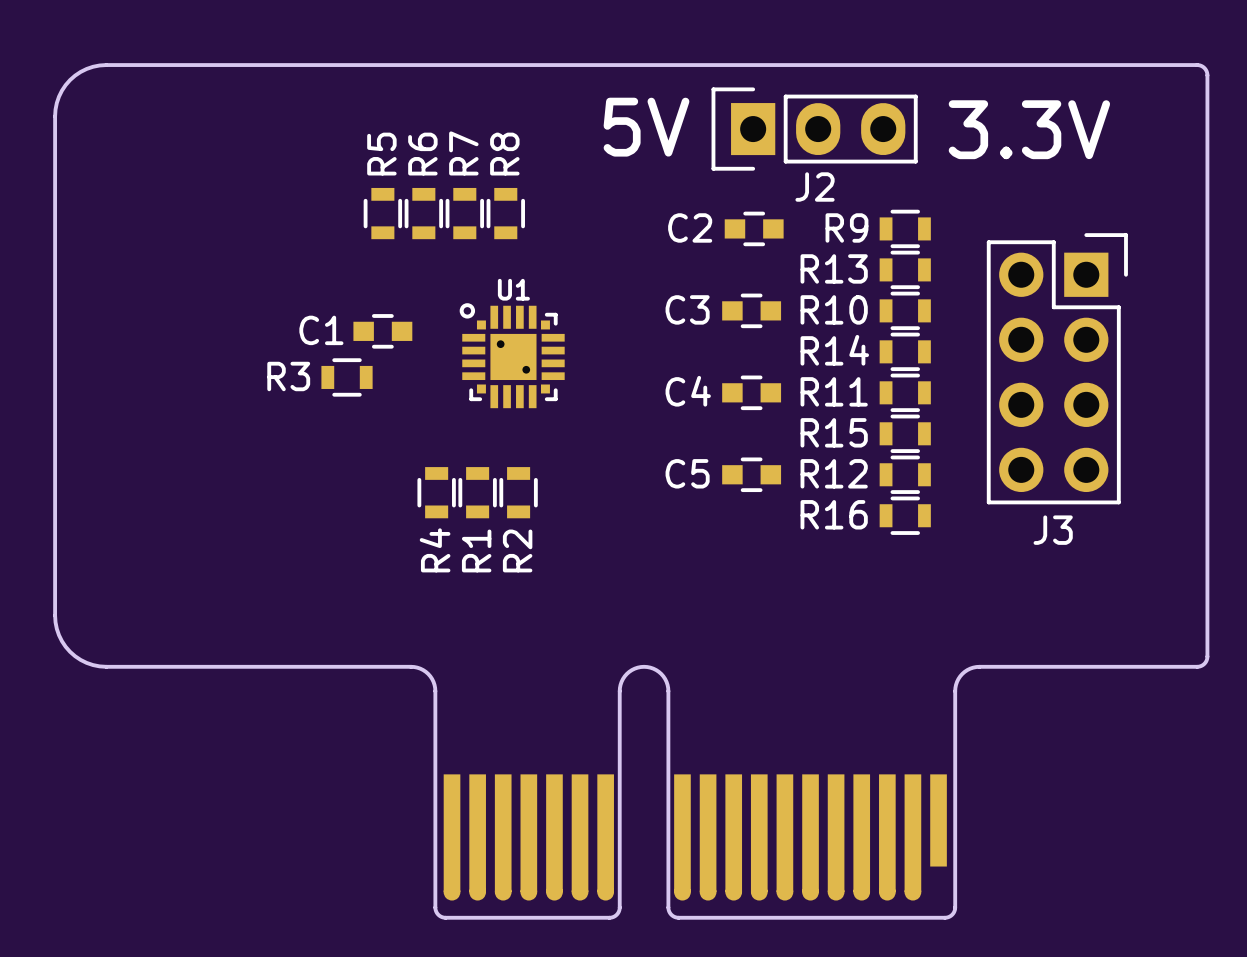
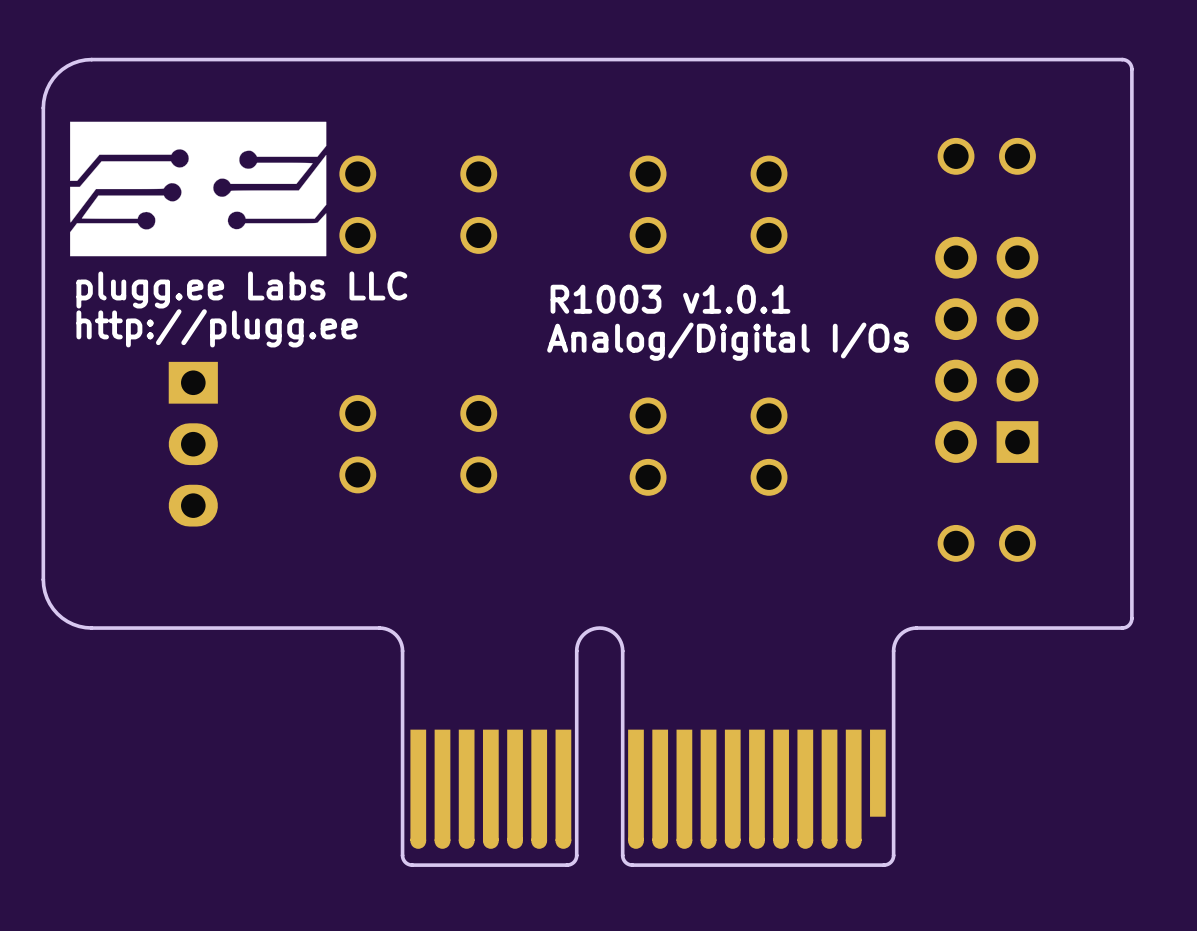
text: 5V (646, 127) -> none
J2: (814, 129) -> none
text: 3.3V (1029, 129) -> none
drawing: none -> [70, 121, 327, 257]
part: none -> (986, 156)
R5: (382, 213) -> none
R6: (423, 213) -> none
R7: (464, 213) -> none
R8: (505, 213) -> none
part: none -> (357, 204)
part: none -> (478, 204)
part: none -> (648, 204)
part: none -> (769, 204)
C2: (754, 228) -> none
R9: (905, 228) -> none
R13: (905, 269) -> none
text: none -> plugg.ee Labs LLC (241, 289)
C3: (751, 310) -> none
R10: (905, 310) -> none
text: none -> R1003 v1.0.1 (670, 299)
C1: (382, 331) -> none
text: none -> http://plugg.ee (217, 328)
R14: (905, 351) -> none
U1: (512, 355) -> none
text: none -> Analog/Digital I/Os (728, 341)
J3 side: top (1057, 368) -> bottom (986, 349)
R3: (347, 377) -> none
C4: (751, 392) -> none
R11: (905, 392) -> none
R15: (905, 433) -> none
part: none -> (193, 444)
part: none -> (357, 444)
part: none -> (478, 444)
part: none -> (648, 446)
C5: (751, 474) -> none
part: none -> (769, 446)
R12: (905, 474) -> none
R4: (436, 492) -> none
R1: (477, 492) -> none
R2: (518, 492) -> none
R16: (905, 515) -> none
part: none -> (986, 543)

